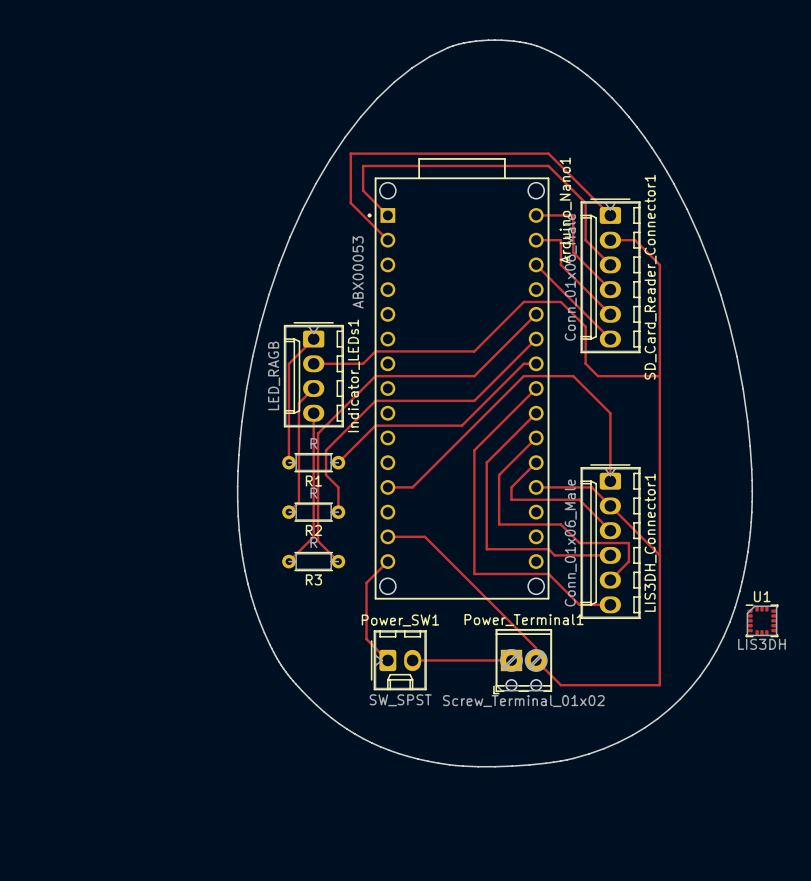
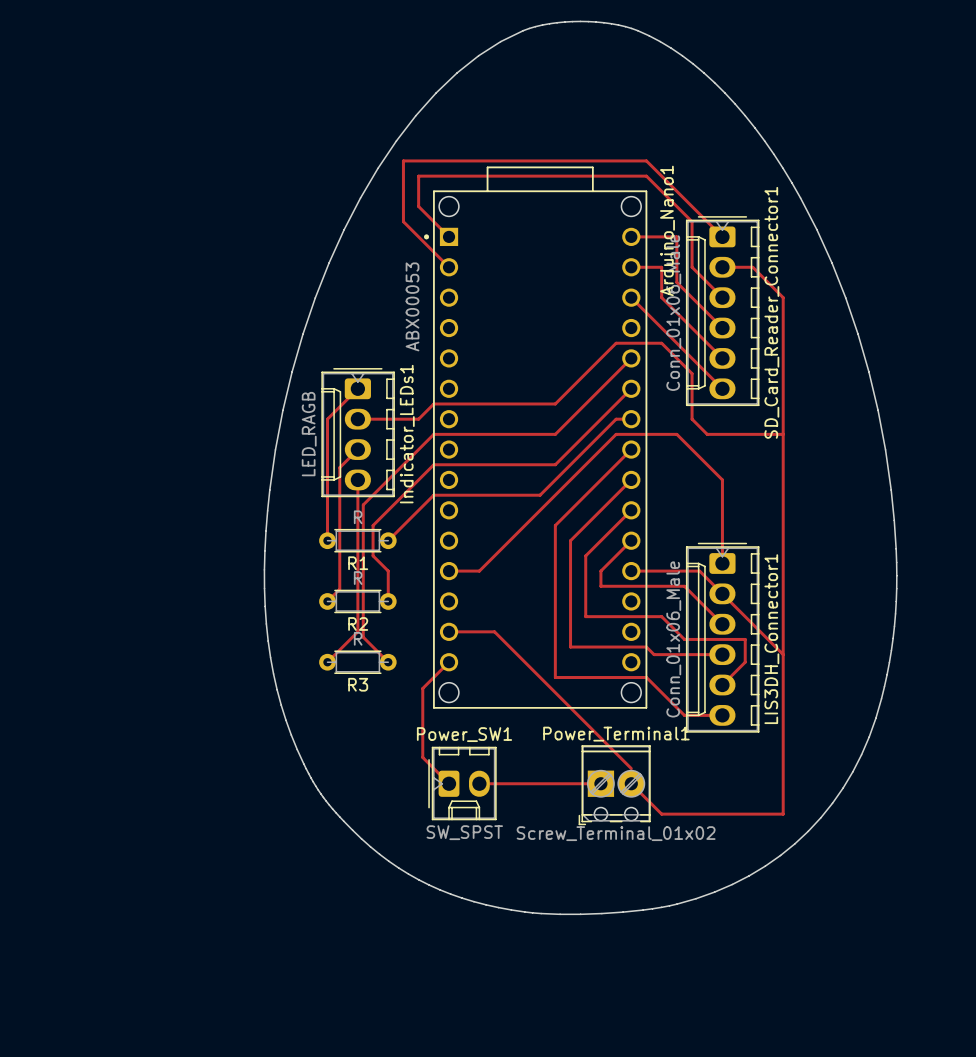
U1: LIS3DH (761, 620) -> none

